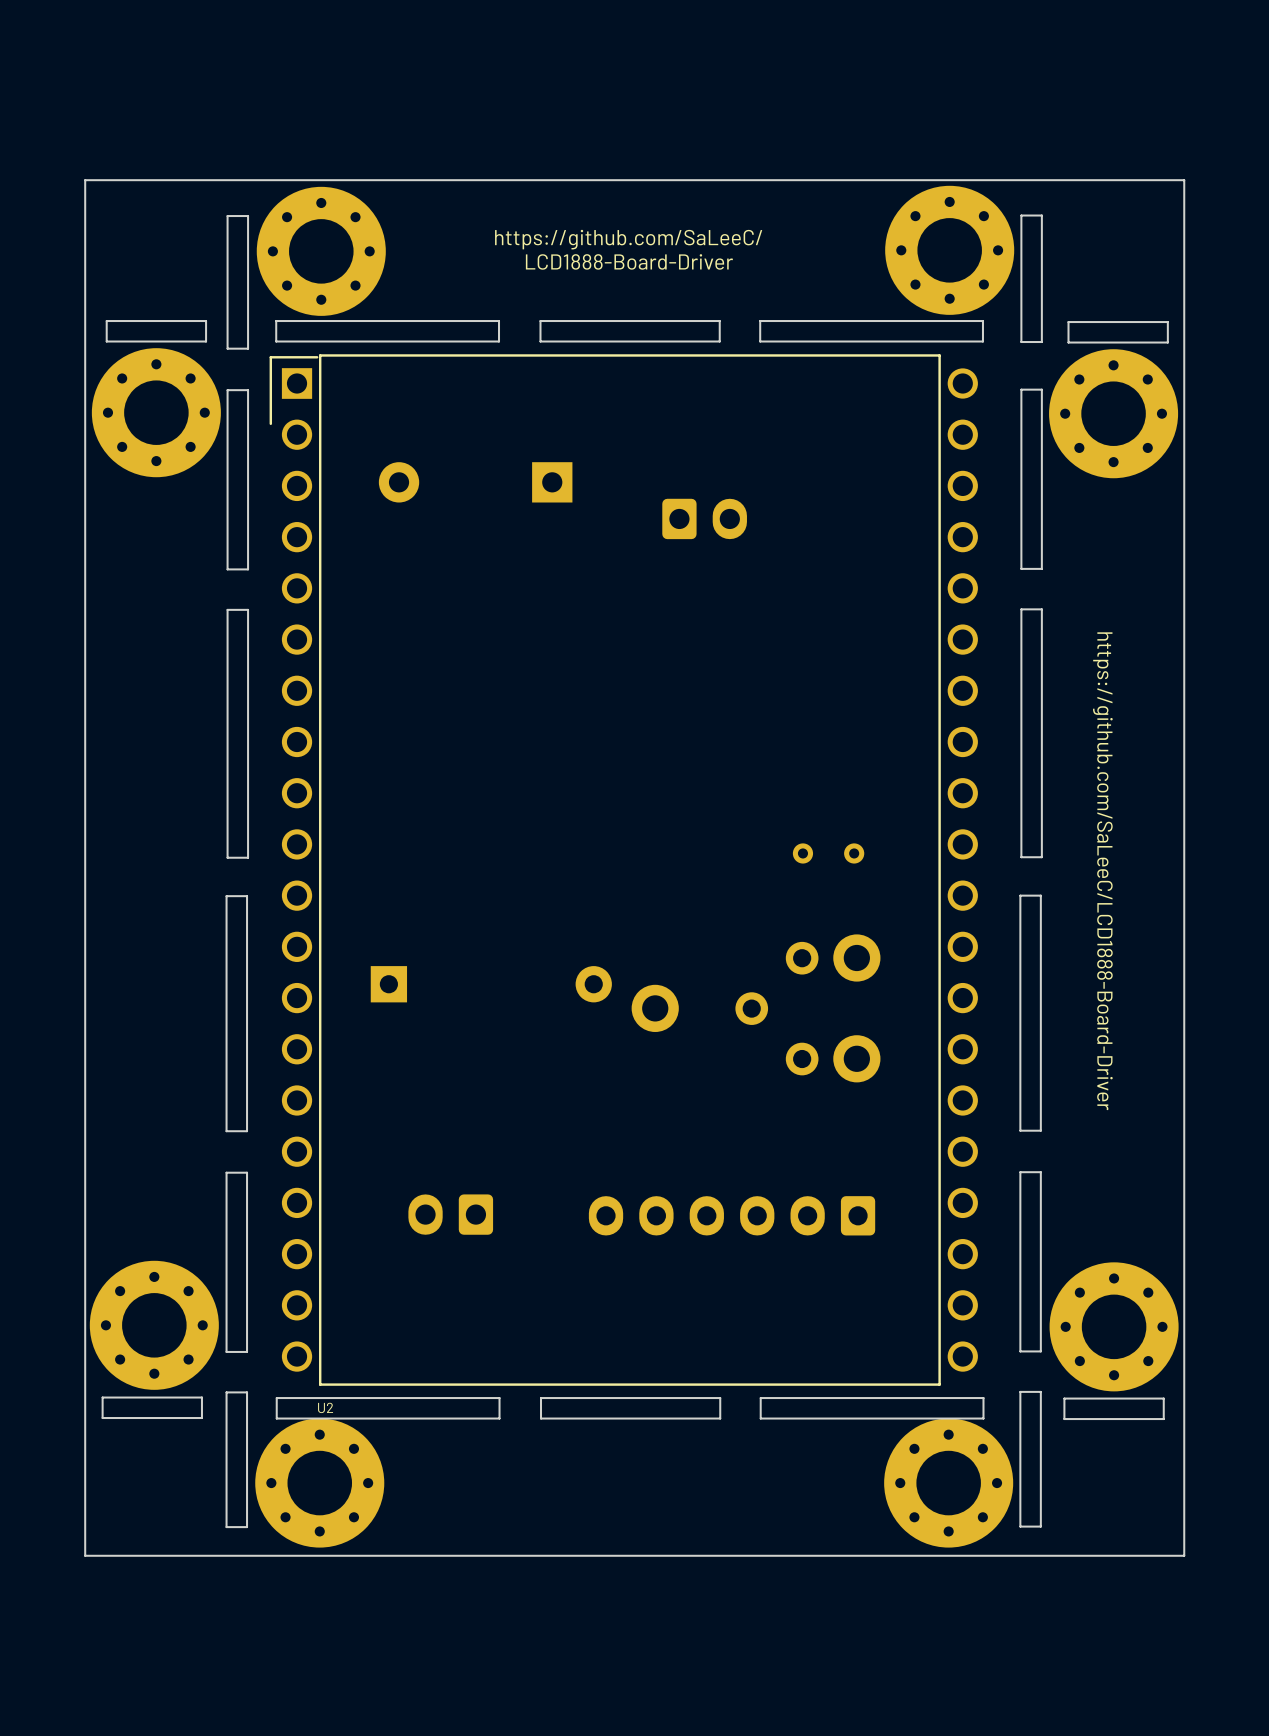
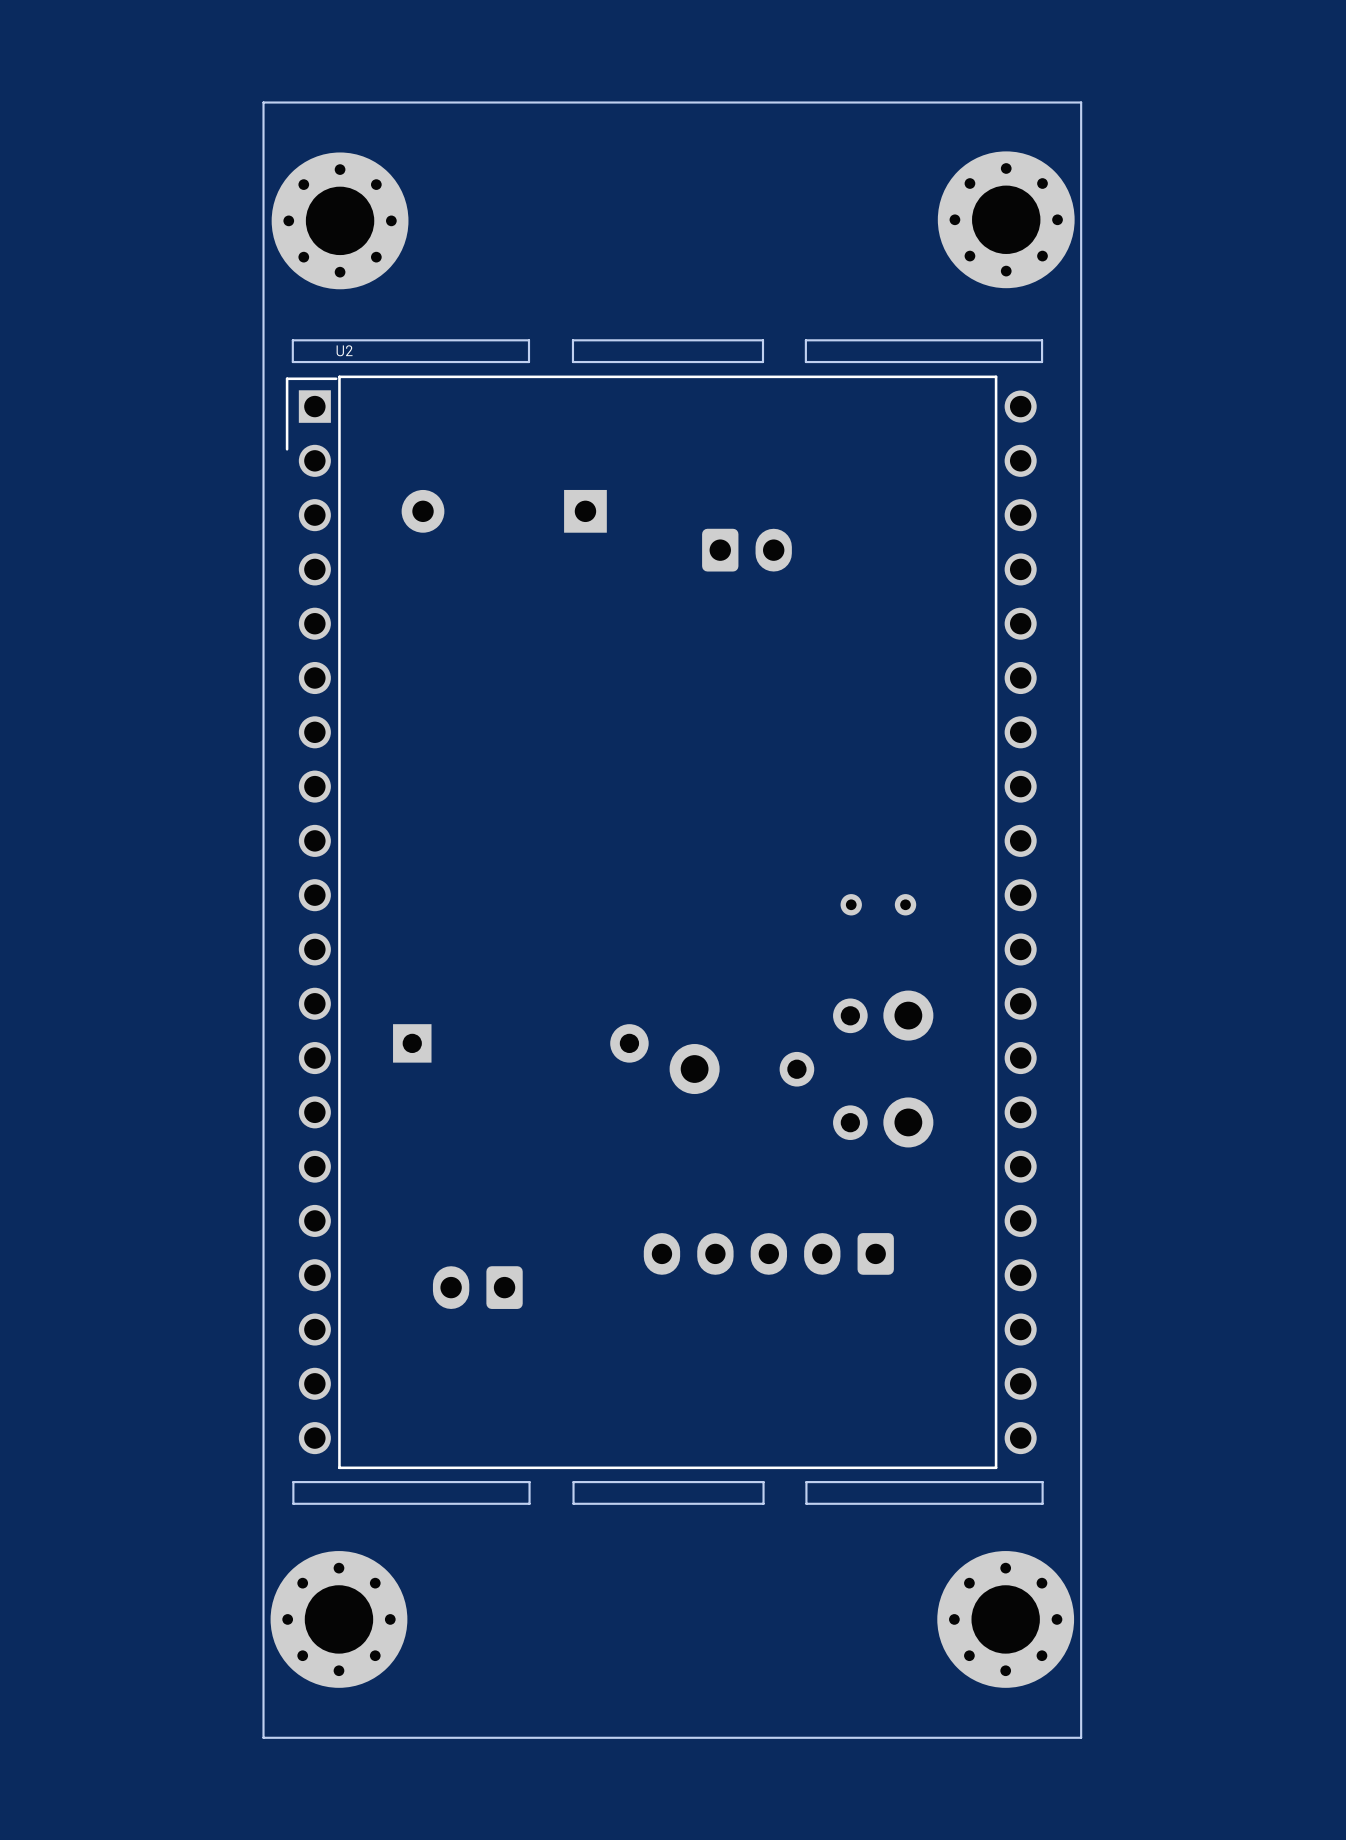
board edge: (1184, 180) (85, 180) (85, 1555) (1184, 1555) (1184, 180) -> (1081, 102) (1081, 1737) (263, 1737) (263, 102) (1081, 102)
board edge: (1041, 215) (1041, 342) (1021, 342) (1021, 215) (1041, 215) -> none
board edge: (248, 216) (248, 348) (227, 348) (227, 216) (248, 216) -> none
text: https://github.com/SaLeeC/ (628, 239) -> none
part position: (949, 250) -> (1006, 219)
part position: (321, 251) -> (340, 220)
text: LCD1888-Board-Driver (629, 261) -> none
board edge: (206, 321) (106, 321) (106, 341) (206, 341) (206, 321) -> none
board edge: (1167, 322) (1068, 322) (1068, 342) (1167, 342) (1167, 322) -> none
board edge: (1041, 389) (1021, 389) (1021, 568) (1041, 568) (1041, 389) -> none
board edge: (248, 390) (227, 390) (227, 569) (248, 569) (248, 390) -> none
part: (156, 412) -> none
part: (1113, 413) -> none
board edge: (248, 609) (248, 857) (227, 857) (227, 609) (248, 609) -> none
board edge: (1041, 609) (1041, 857) (1021, 857) (1021, 609) (1041, 609) -> none
text: https://github.com/SaLeeC/LCD1888-Board-Driver (1102, 871) -> none
board edge: (1040, 895) (1040, 1130) (1020, 1130) (1020, 895) (1040, 895) -> none
board edge: (247, 896) (247, 1131) (226, 1131) (226, 896) (247, 896) -> none
board edge: (247, 1172) (247, 1351) (226, 1351) (226, 1172) (247, 1172) -> none
board edge: (1040, 1172) (1020, 1172) (1020, 1351) (1040, 1351) (1040, 1172) -> none
part: none -> (768, 1253)
part: (732, 1215) -> none
part: (154, 1325) -> none
part: (1114, 1326) -> none
board edge: (1040, 1391) (1040, 1526) (1020, 1526) (1020, 1391) (1040, 1391) -> none
board edge: (247, 1392) (226, 1392) (226, 1527) (247, 1527) (247, 1392) -> none
board edge: (201, 1397) (102, 1397) (102, 1418) (201, 1418) (201, 1397) -> none
board edge: (1163, 1398) (1064, 1398) (1064, 1419) (1163, 1419) (1163, 1398) -> none
U2 name position: U2 (325, 1407) -> U2 (344, 350)
part position: (319, 1483) -> (338, 1619)
part position: (948, 1483) -> (1005, 1619)

